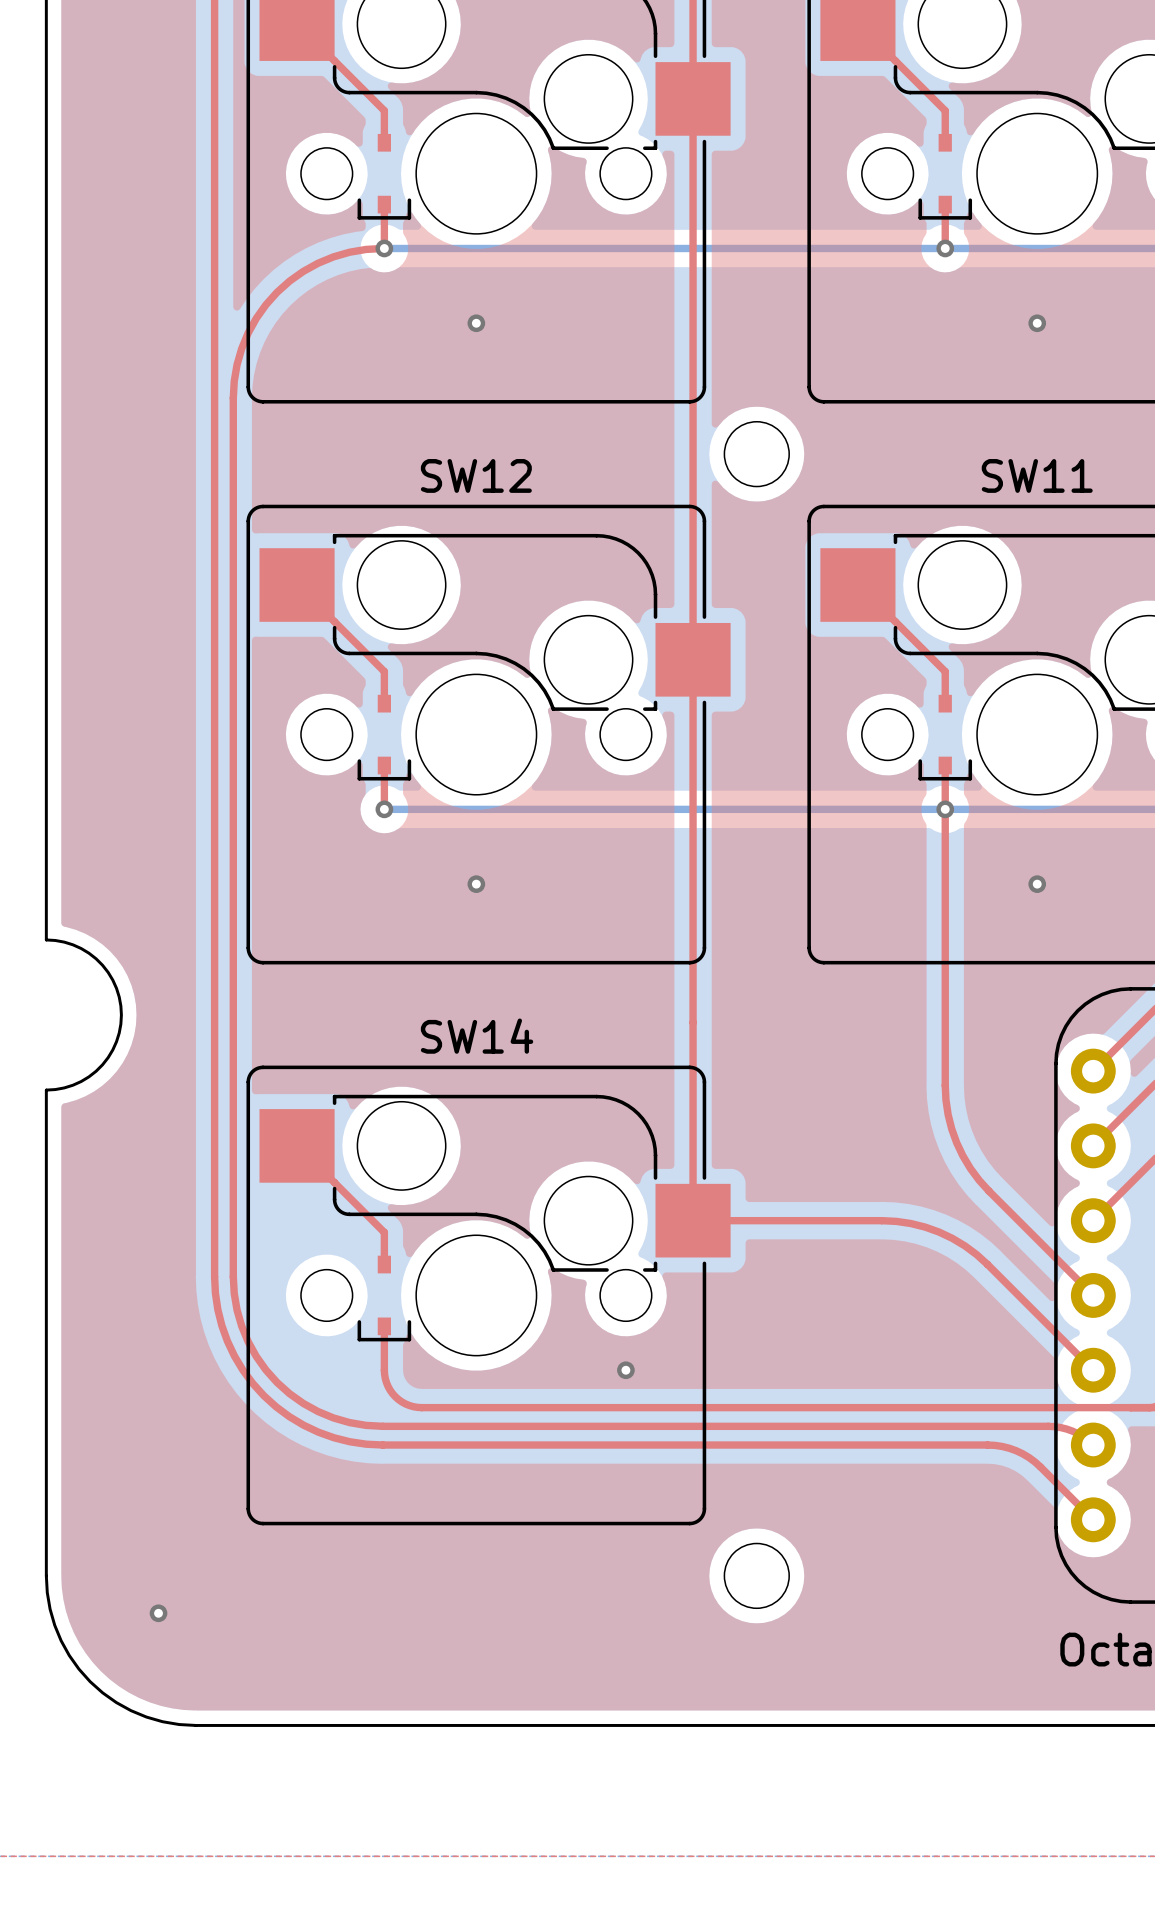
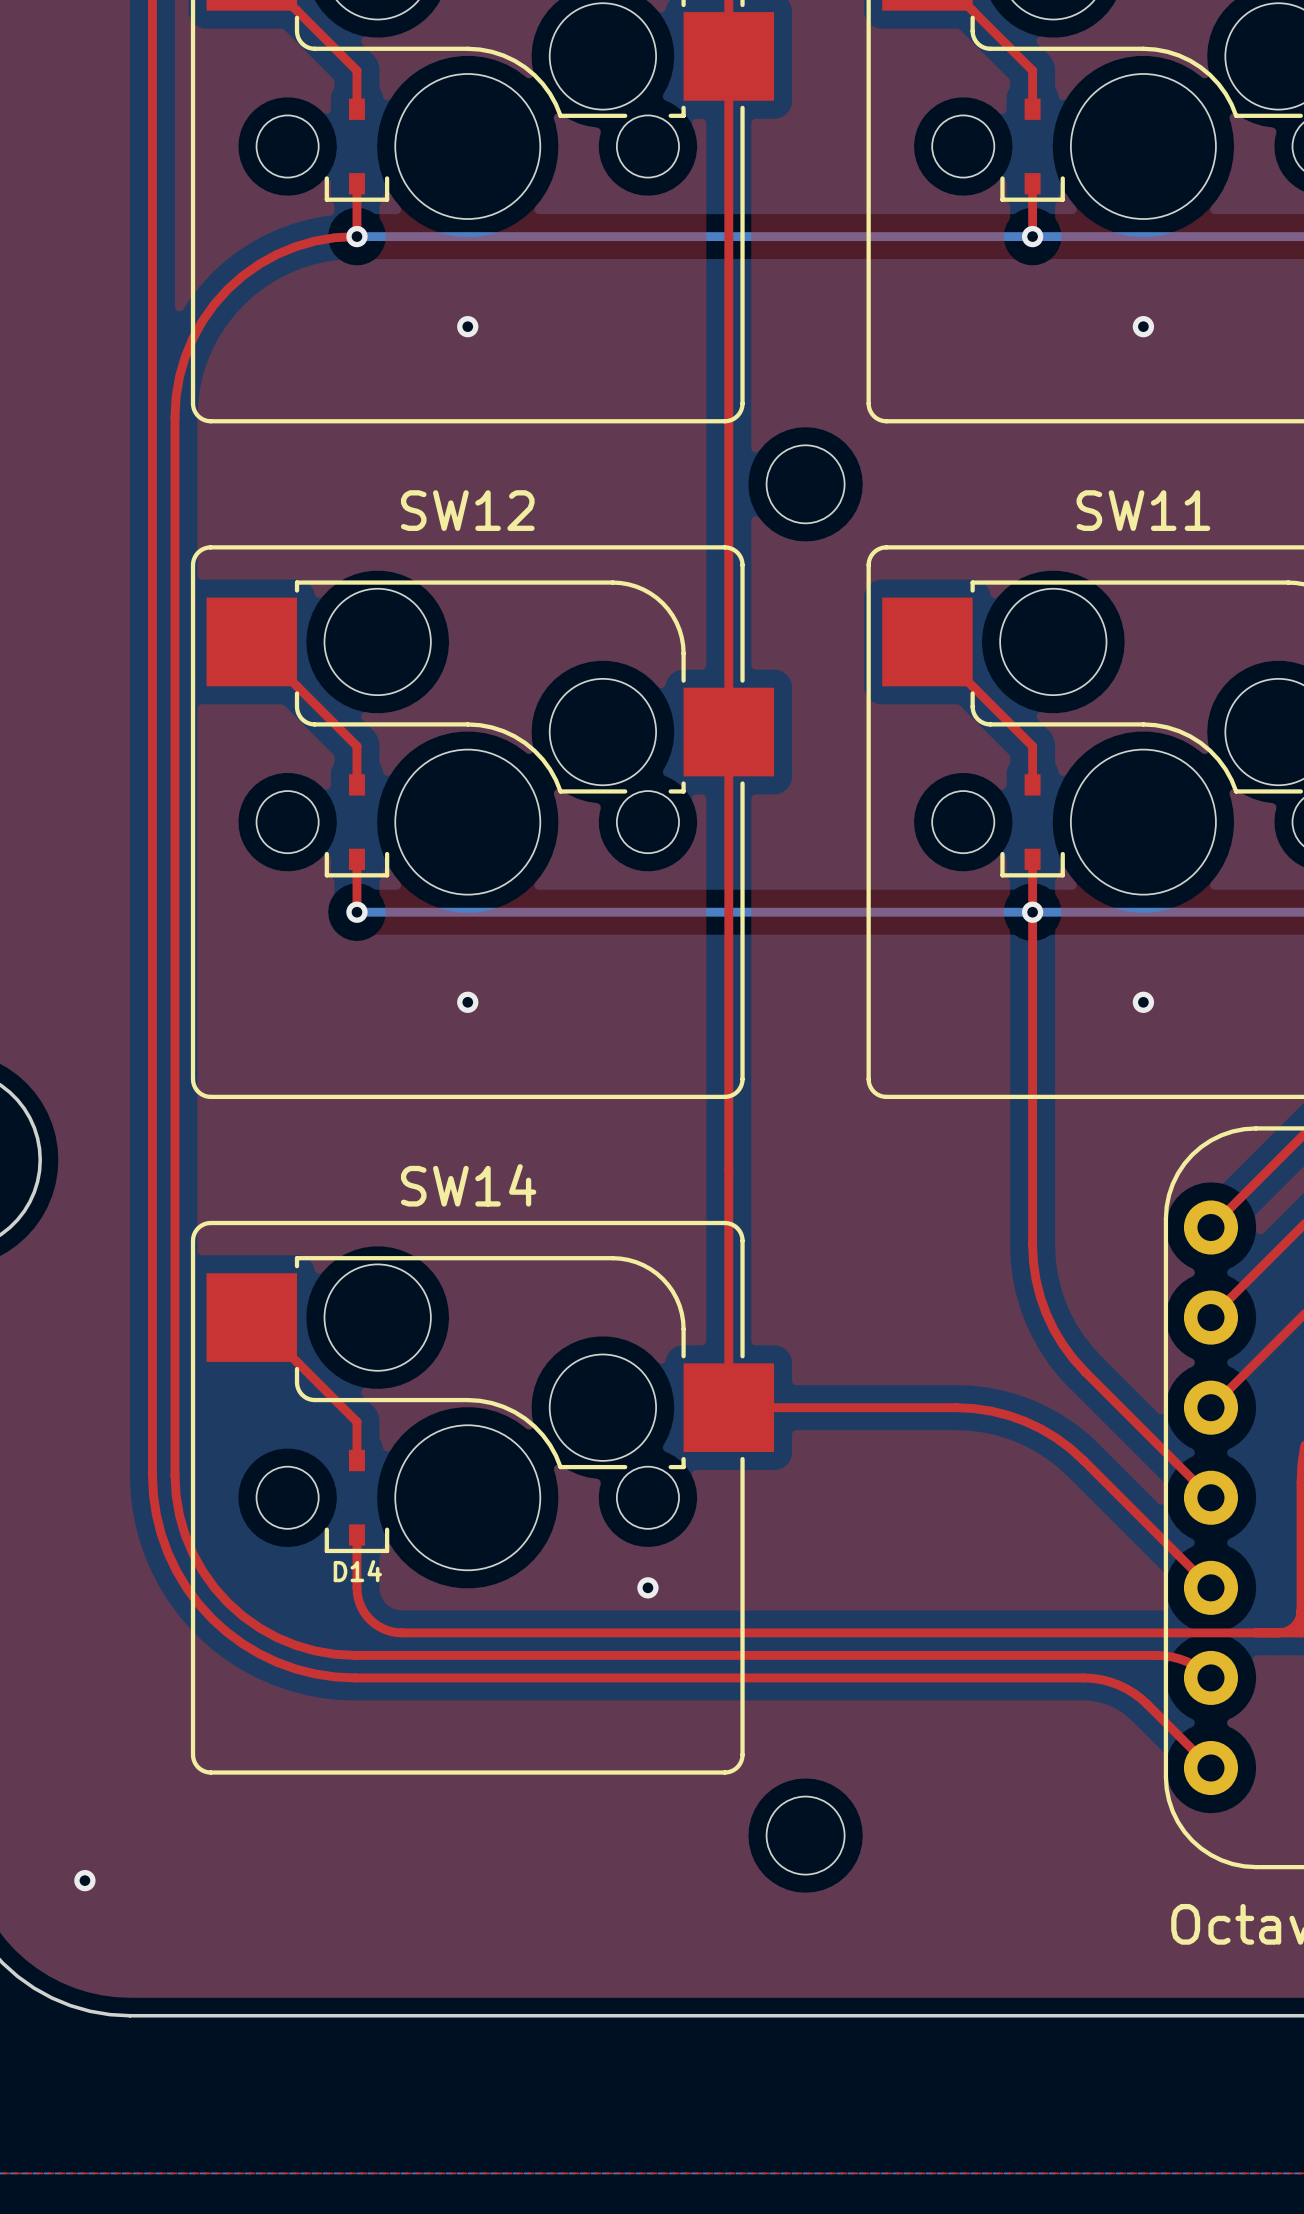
D14 name: none -> D14 (357, 1571)

